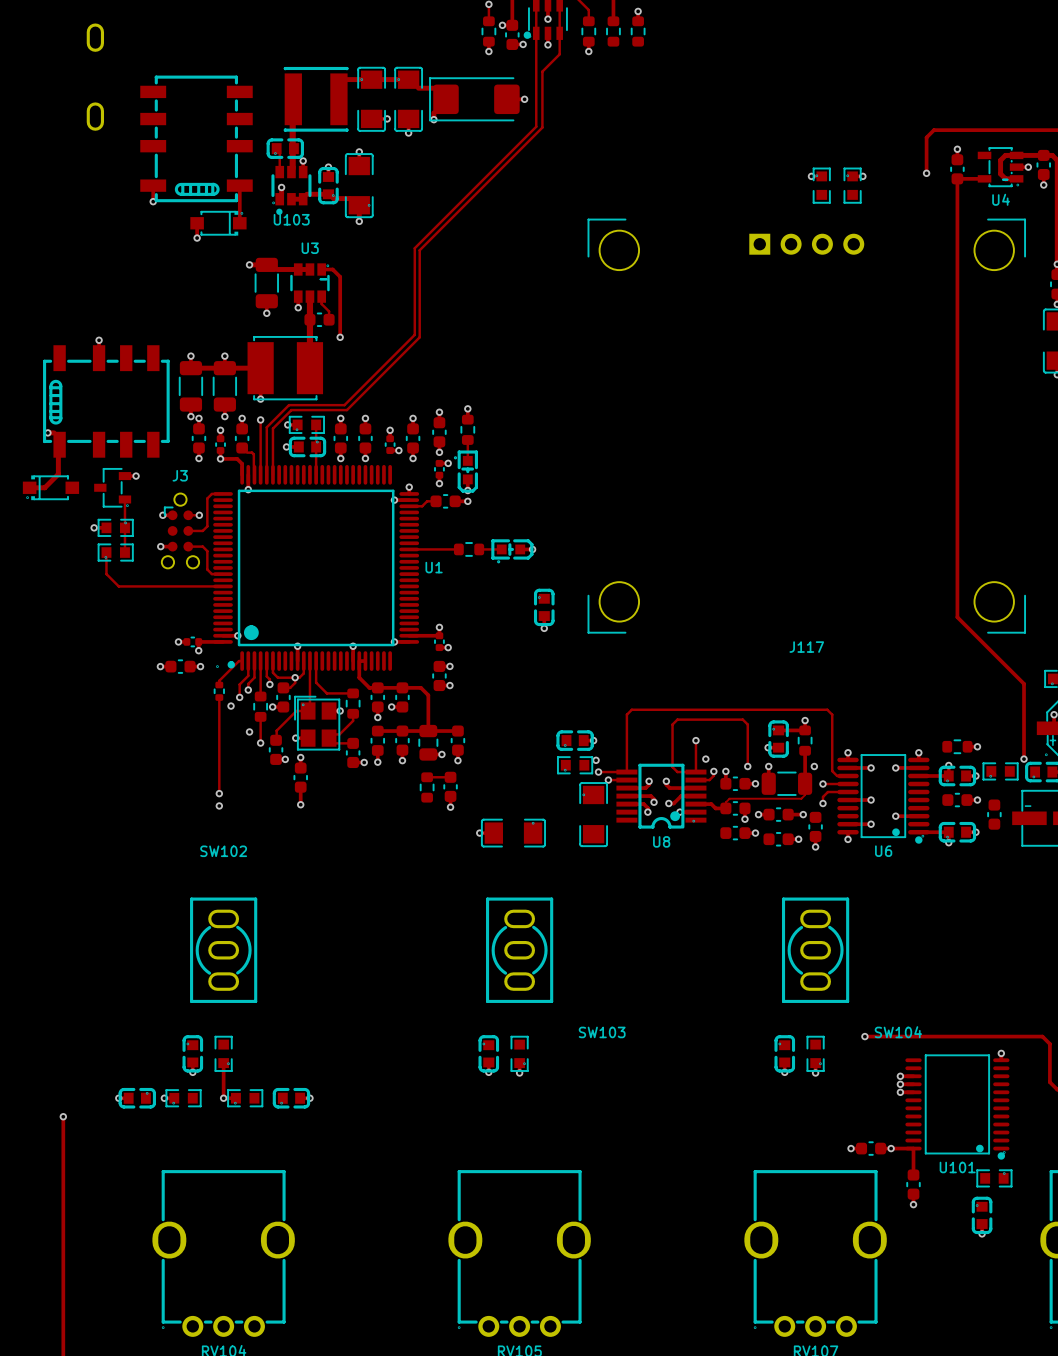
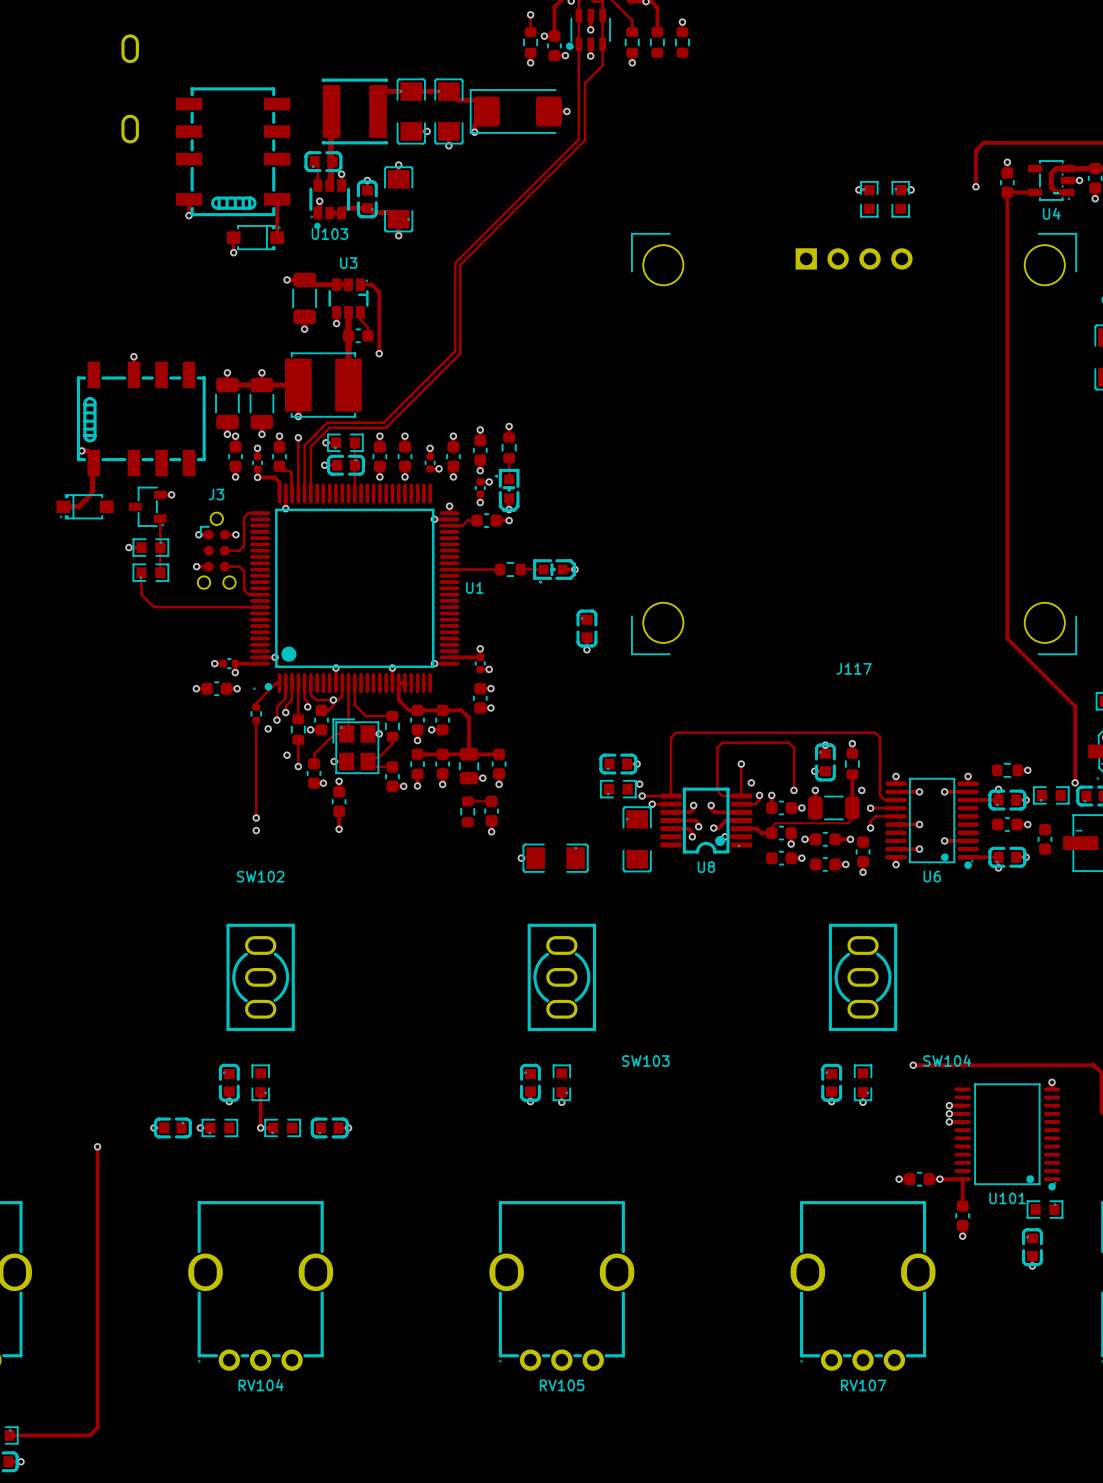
via: none -> (825, 745)
track: (778, 730) (805, 730) -> none

